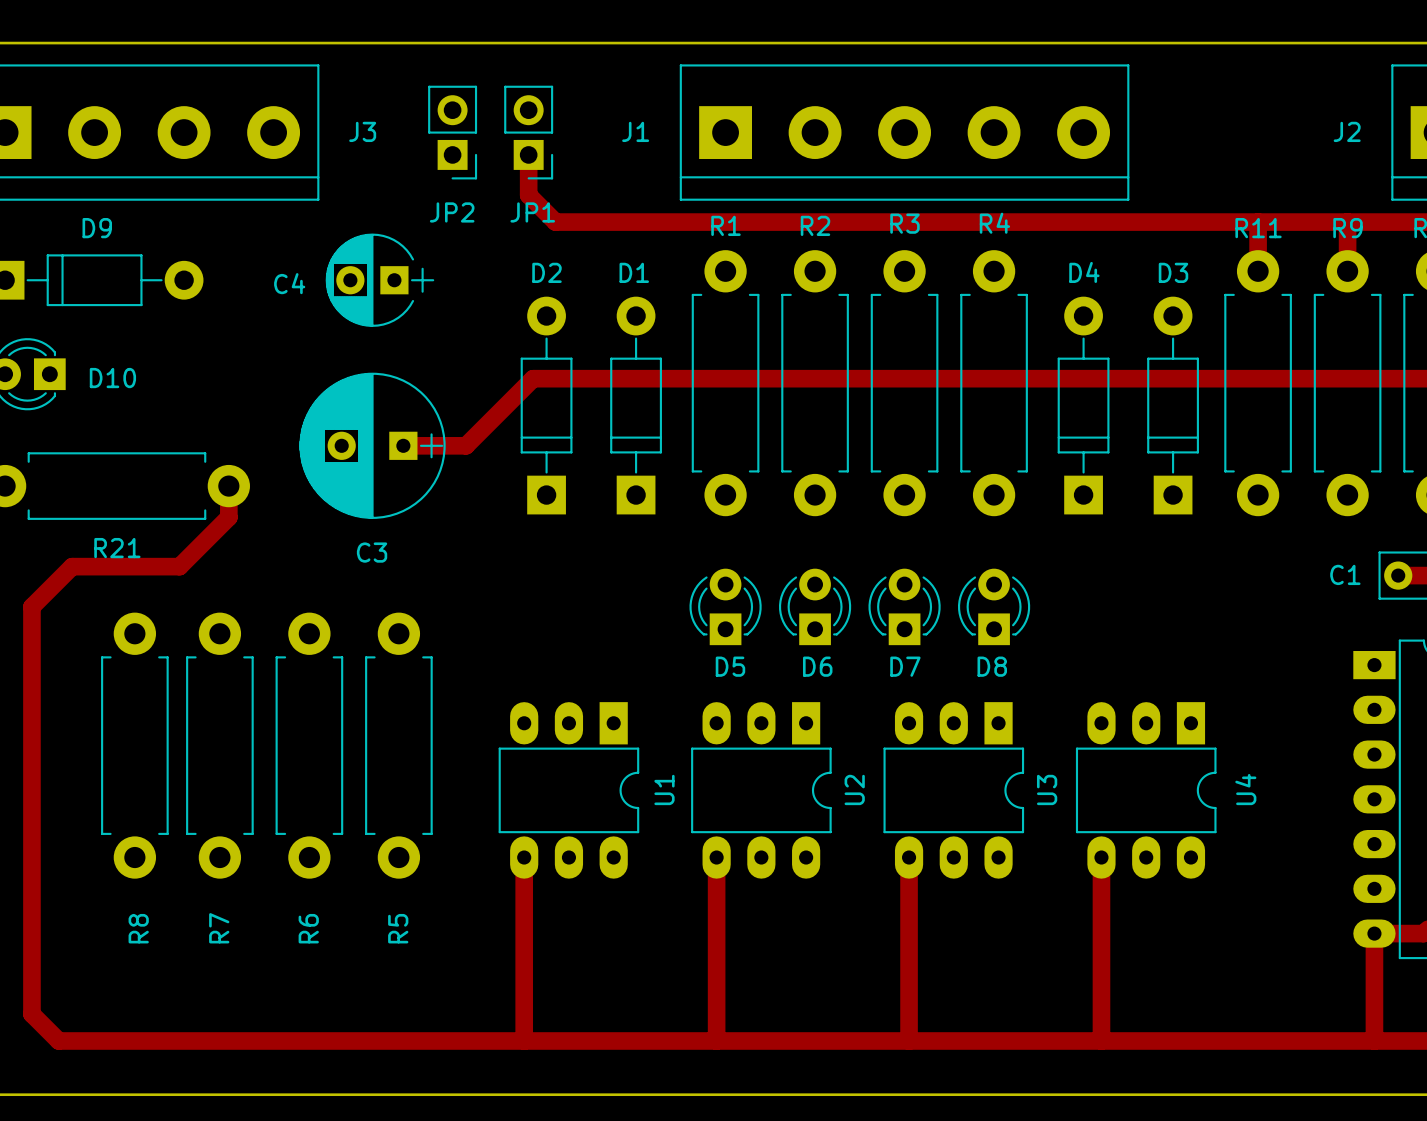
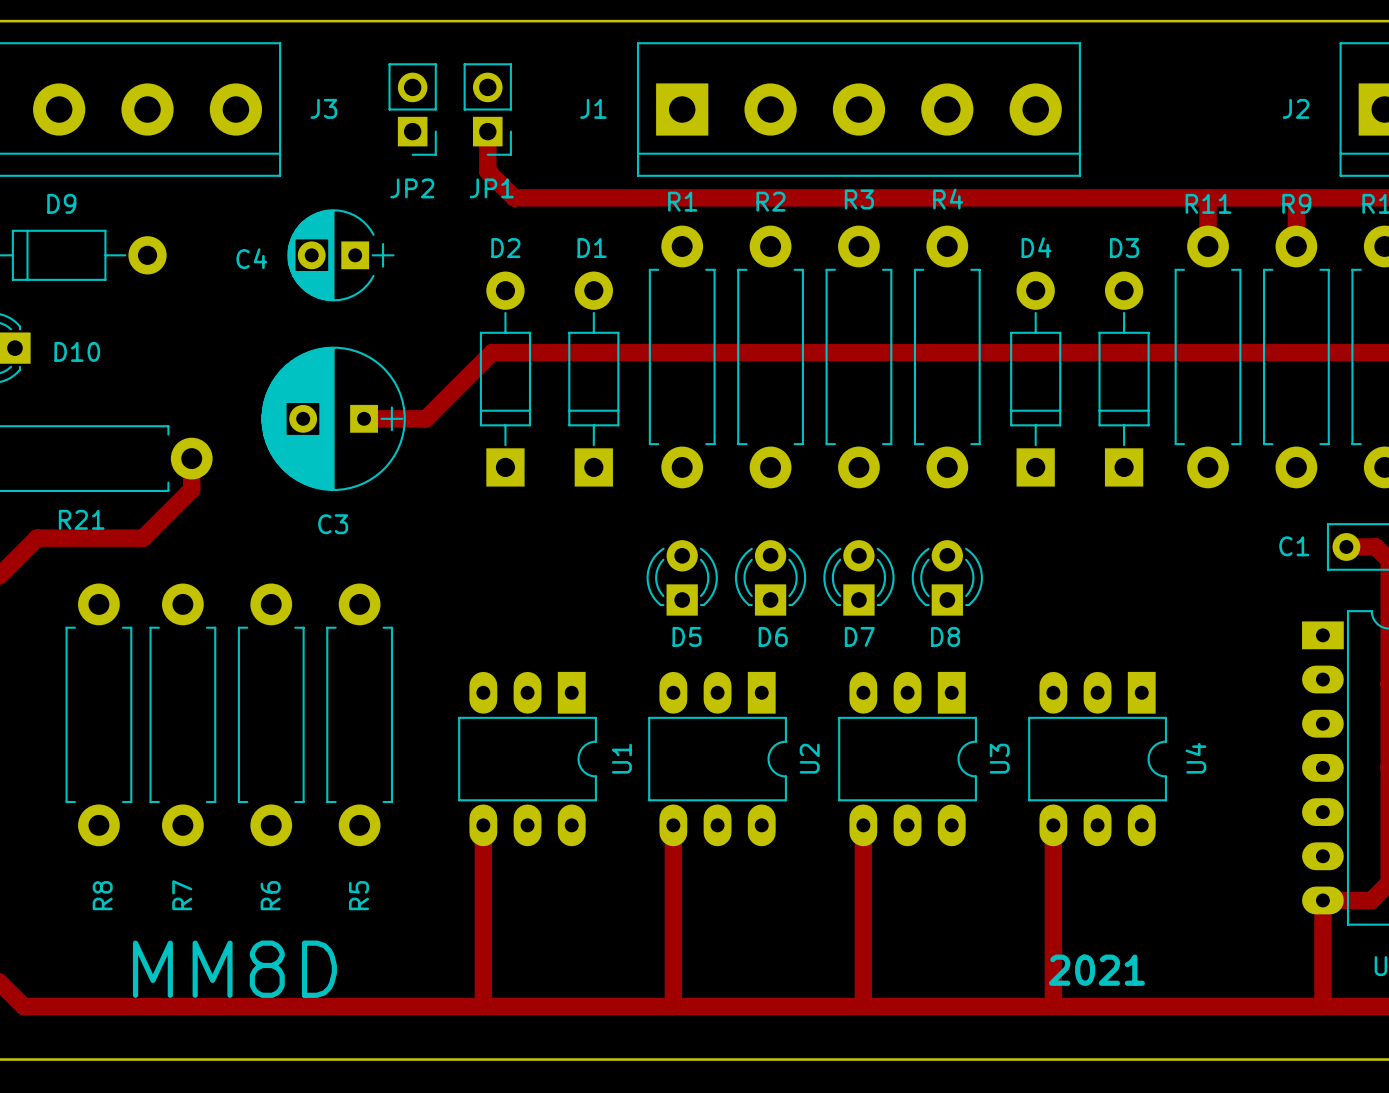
text: none -> MM8D (234, 969)
text: none -> 2021 (1096, 970)

